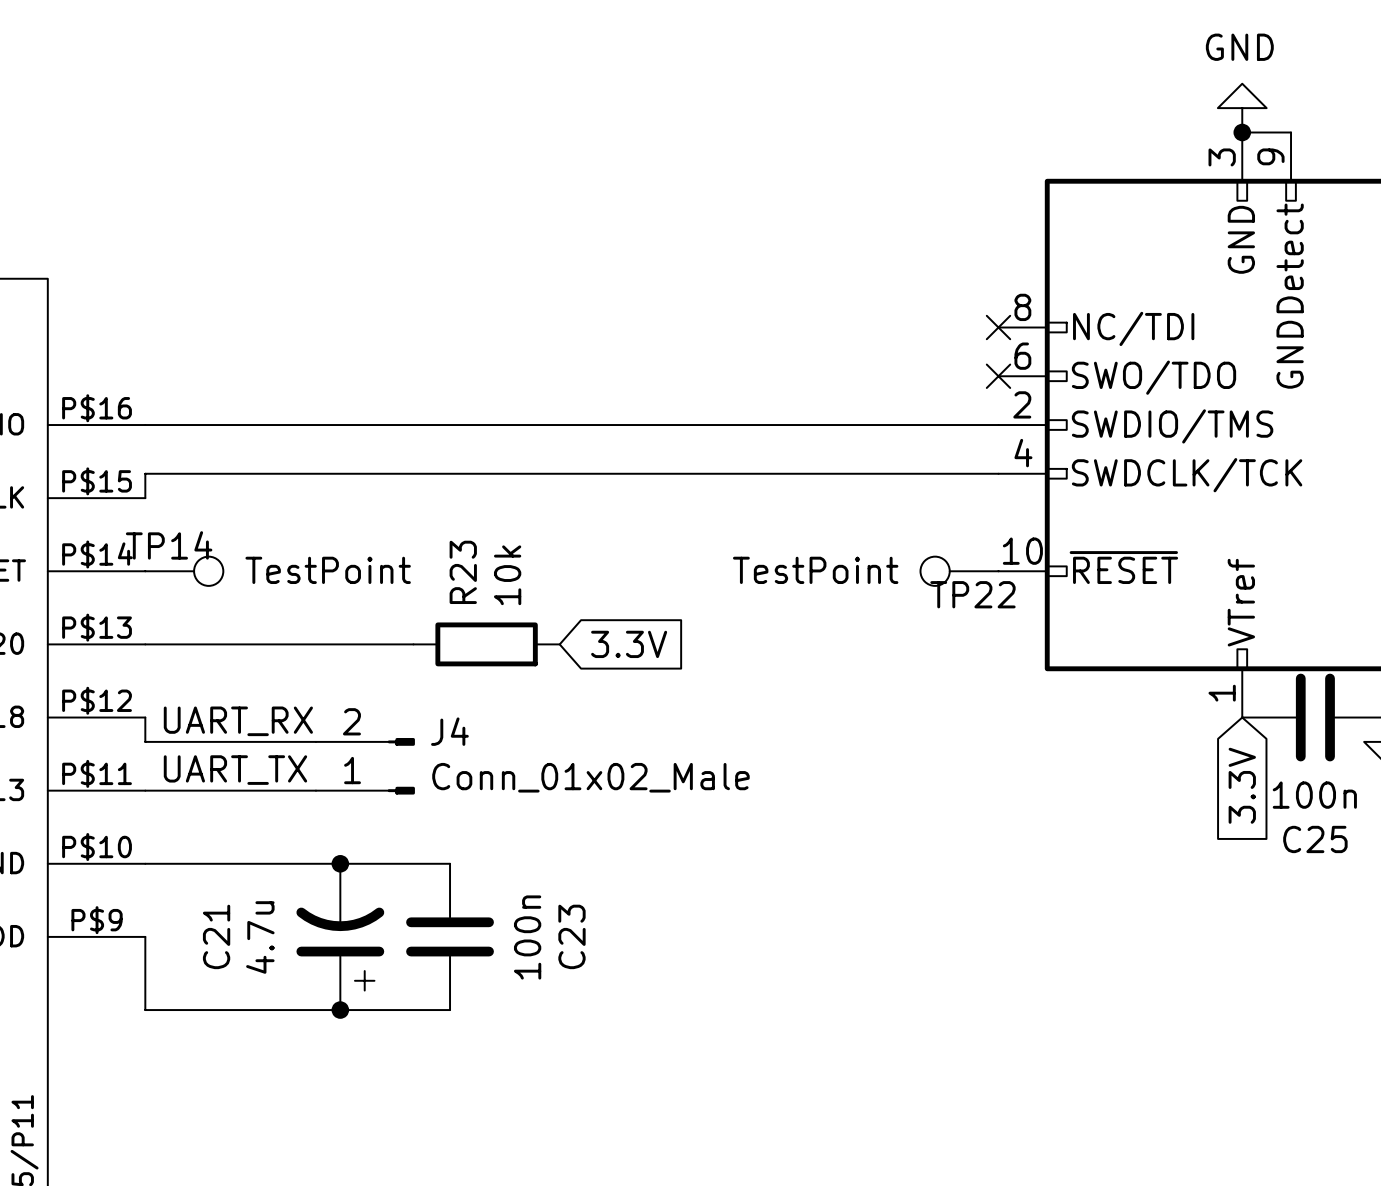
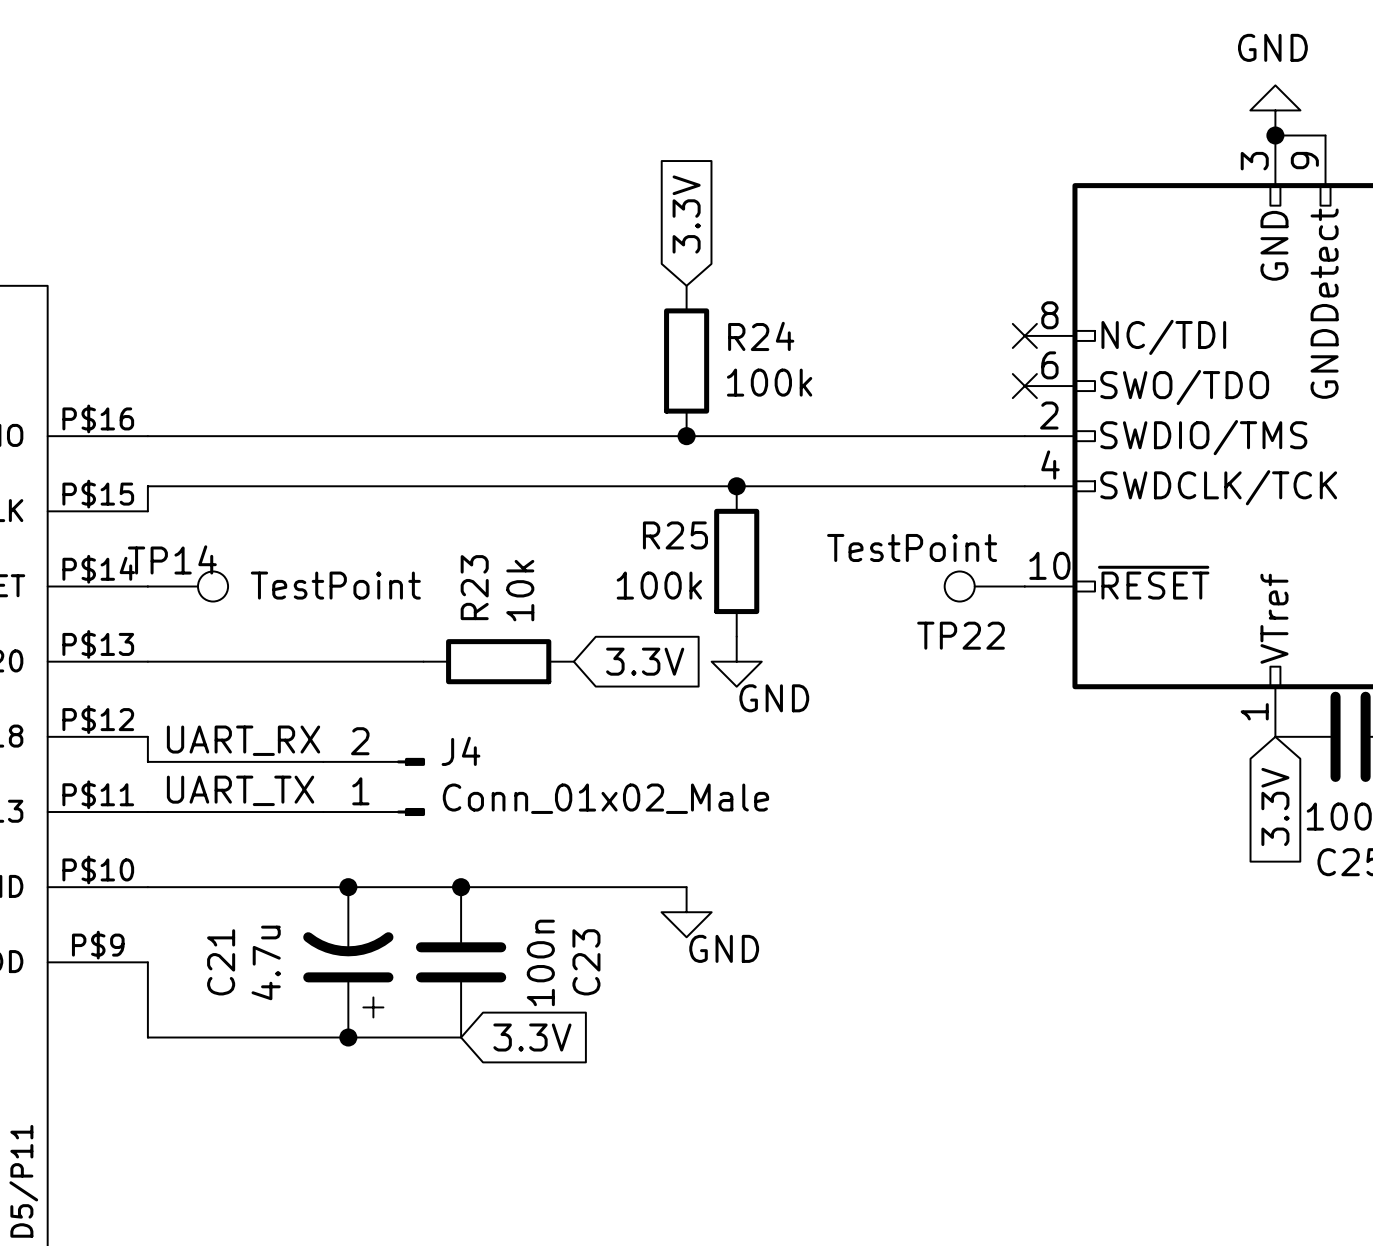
global label: none -> 3.3V (686, 214)
R24: none -> 100k (686, 361)
junction: none -> (686, 436)
junction: none -> (736, 486)
R25: none -> 100k (736, 561)
TP22 value position: TestPoint (815, 570) -> TestPoint (912, 547)
TP22 name position: TP22 (972, 594) -> TP22 (961, 635)
power symbol: none -> GND (736, 661)
wire: none -> (461, 887) (686, 887)
junction: none -> (461, 887)
power symbol: none -> GND (686, 912)
global label: none -> 3.3V (532, 1037)

